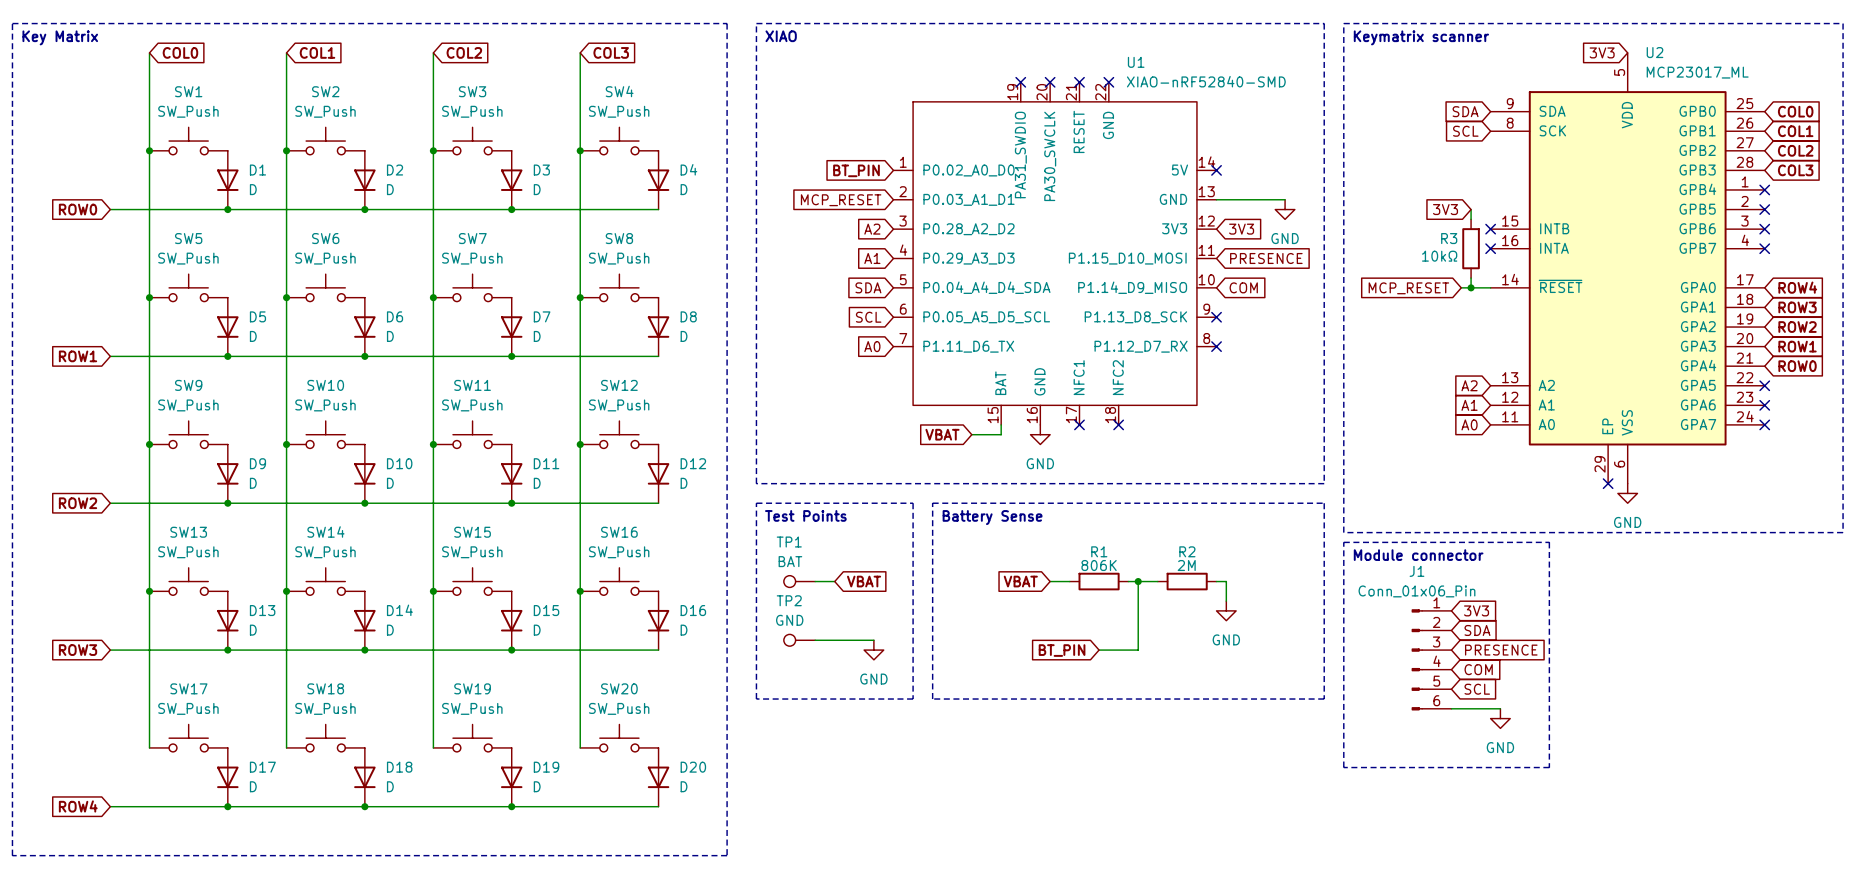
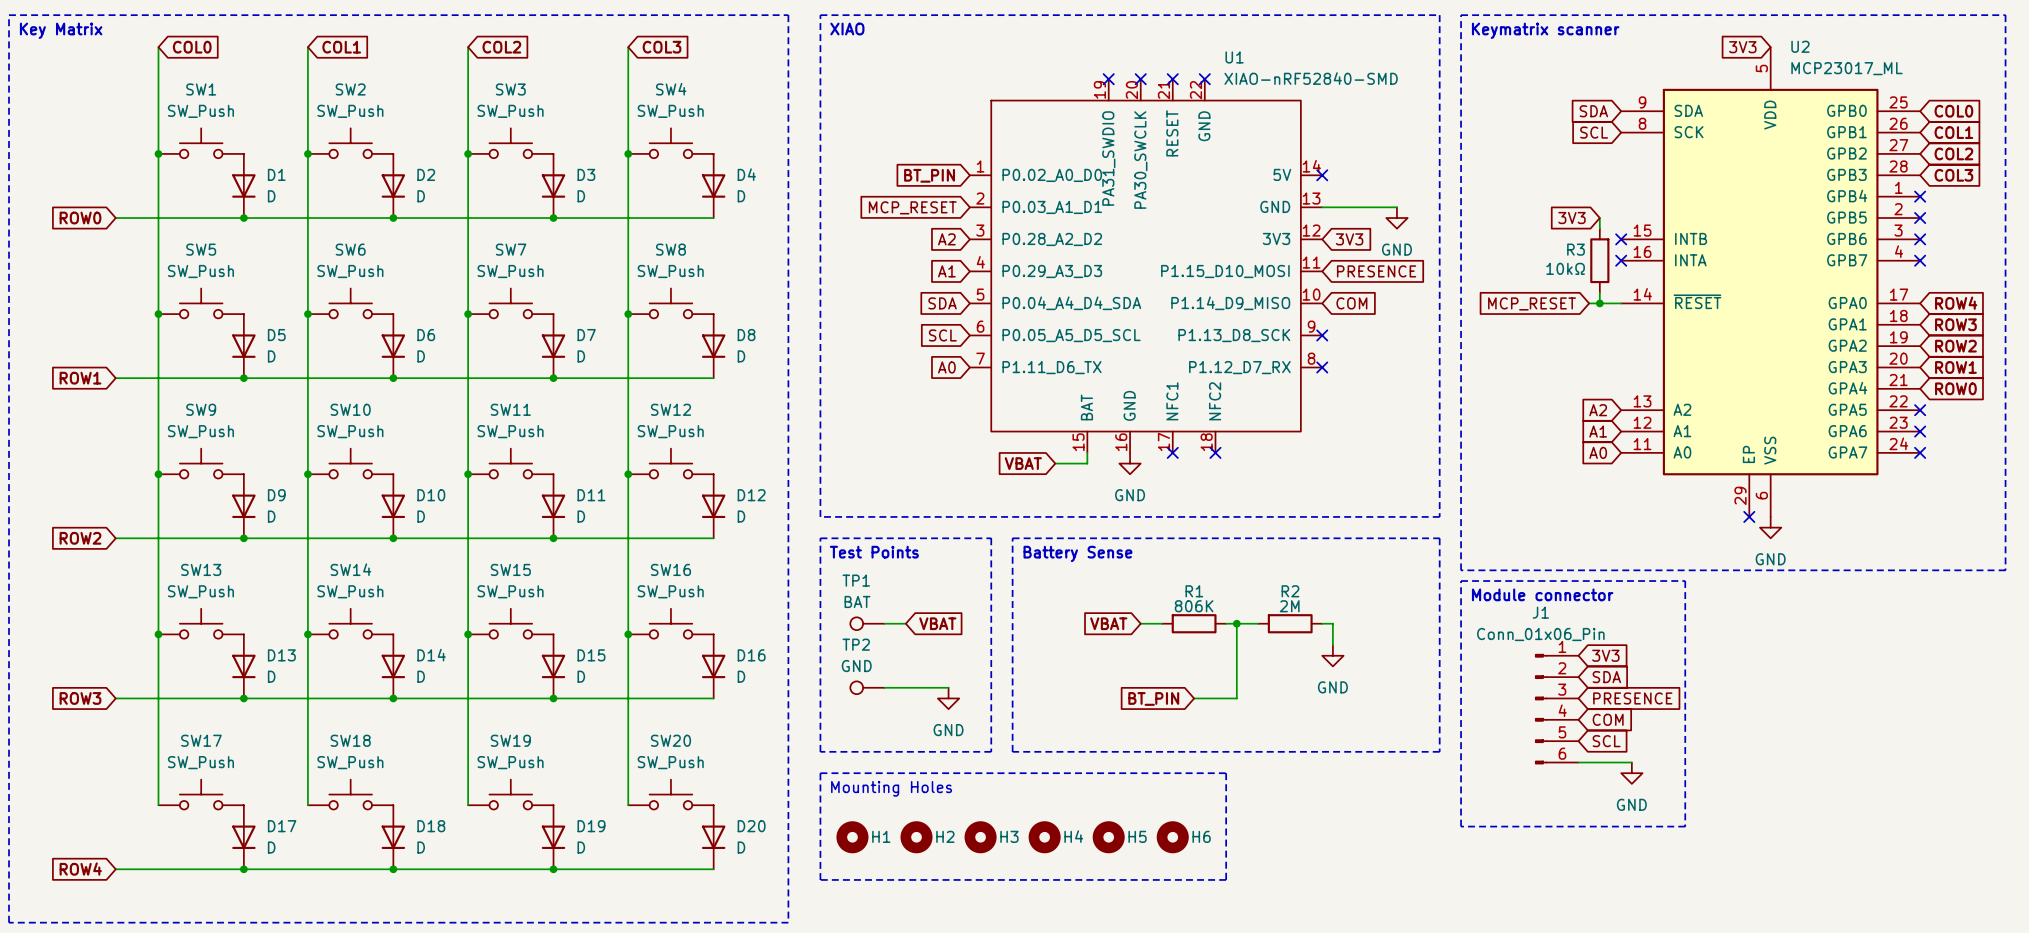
line: none -> (820, 773) (1226, 773) (1226, 879) (820, 879) (820, 773)
text: none -> Mounting Holes (891, 788)
H1: none -> (852, 837)
H2: none -> (916, 837)
H3: none -> (980, 837)
H4: none -> (1044, 837)
H5: none -> (1108, 837)
H6: none -> (1172, 837)

